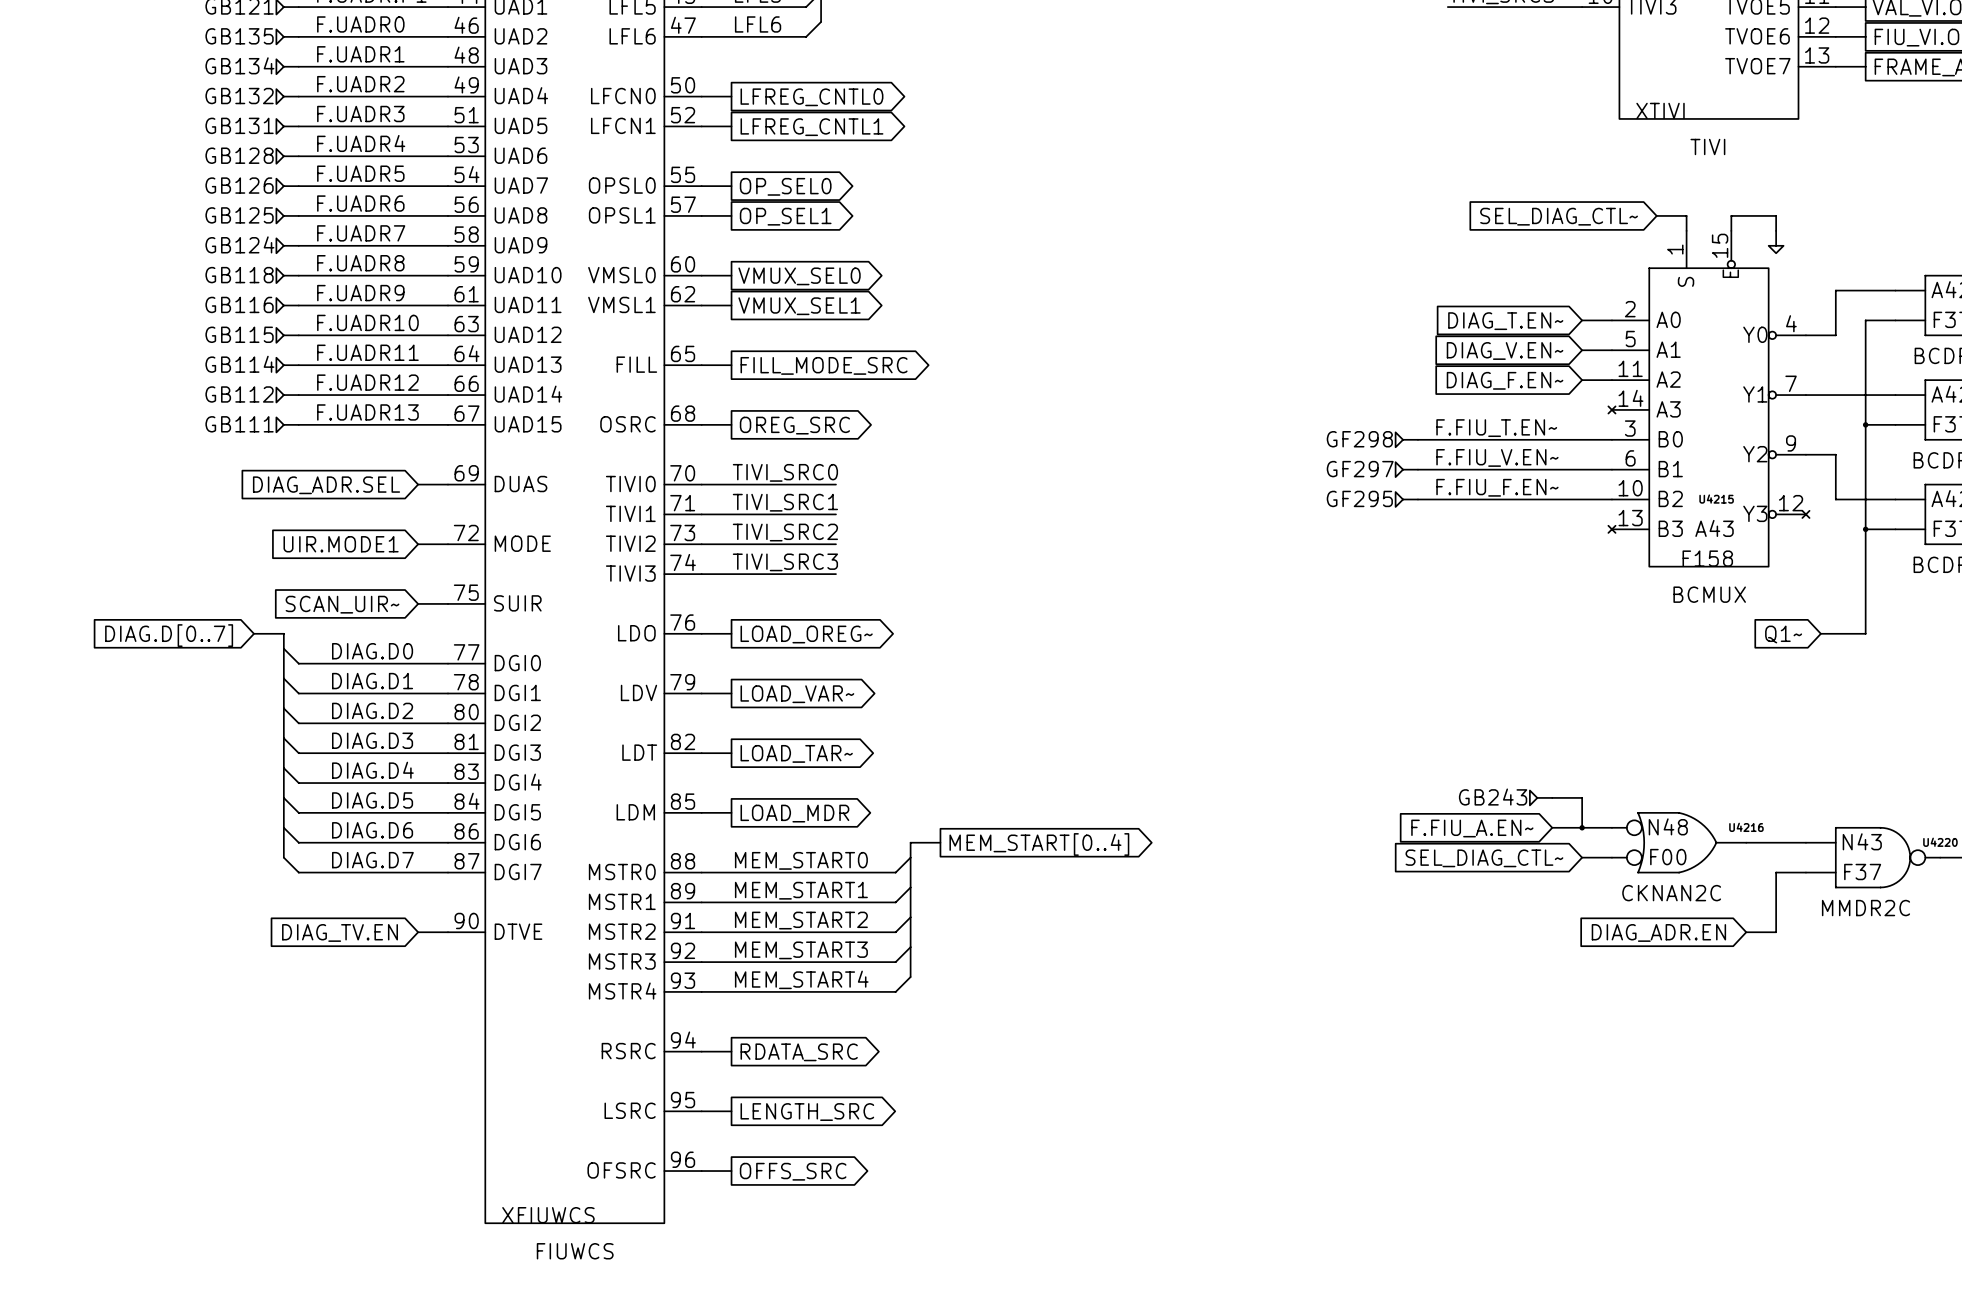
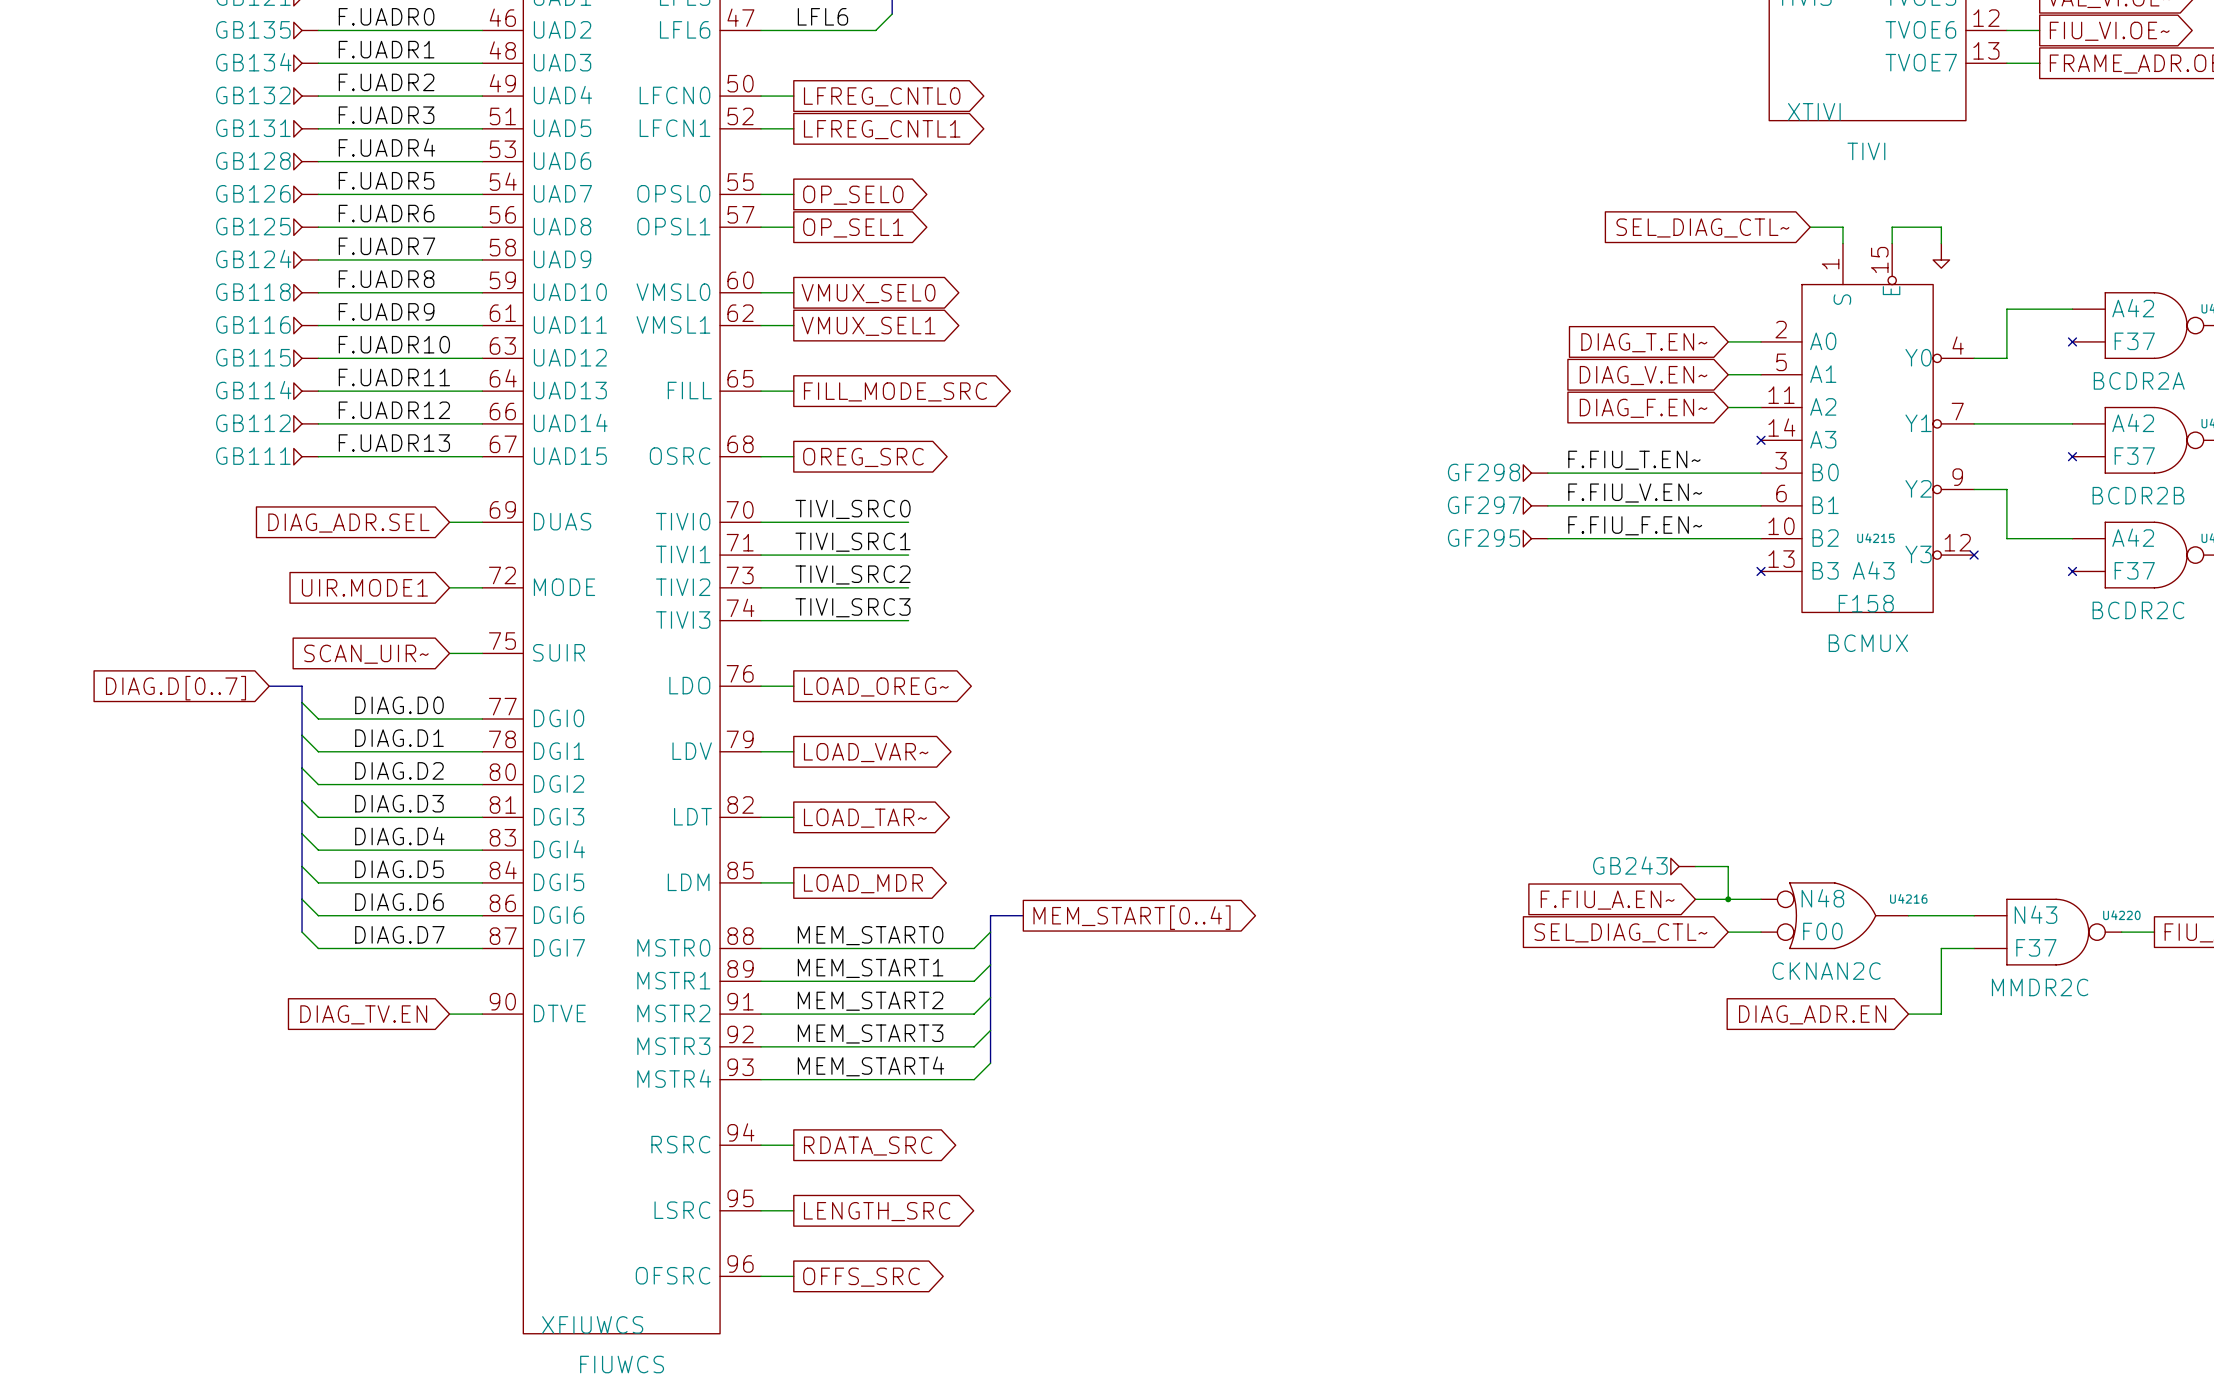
wire: (1895, 320) (1865, 320) (1865, 633) (1820, 633) -> none
no-connect mark: none -> (2072, 341)
wire: (1865, 424) (1895, 424) -> none
junction: (1865, 424) -> none
no-connect mark: none -> (2072, 456)
wire: (1865, 529) (1895, 529) -> none
junction: (1865, 529) -> none
no-connect mark: none -> (2072, 571)
global label: Q1~ (1783, 634) -> none

